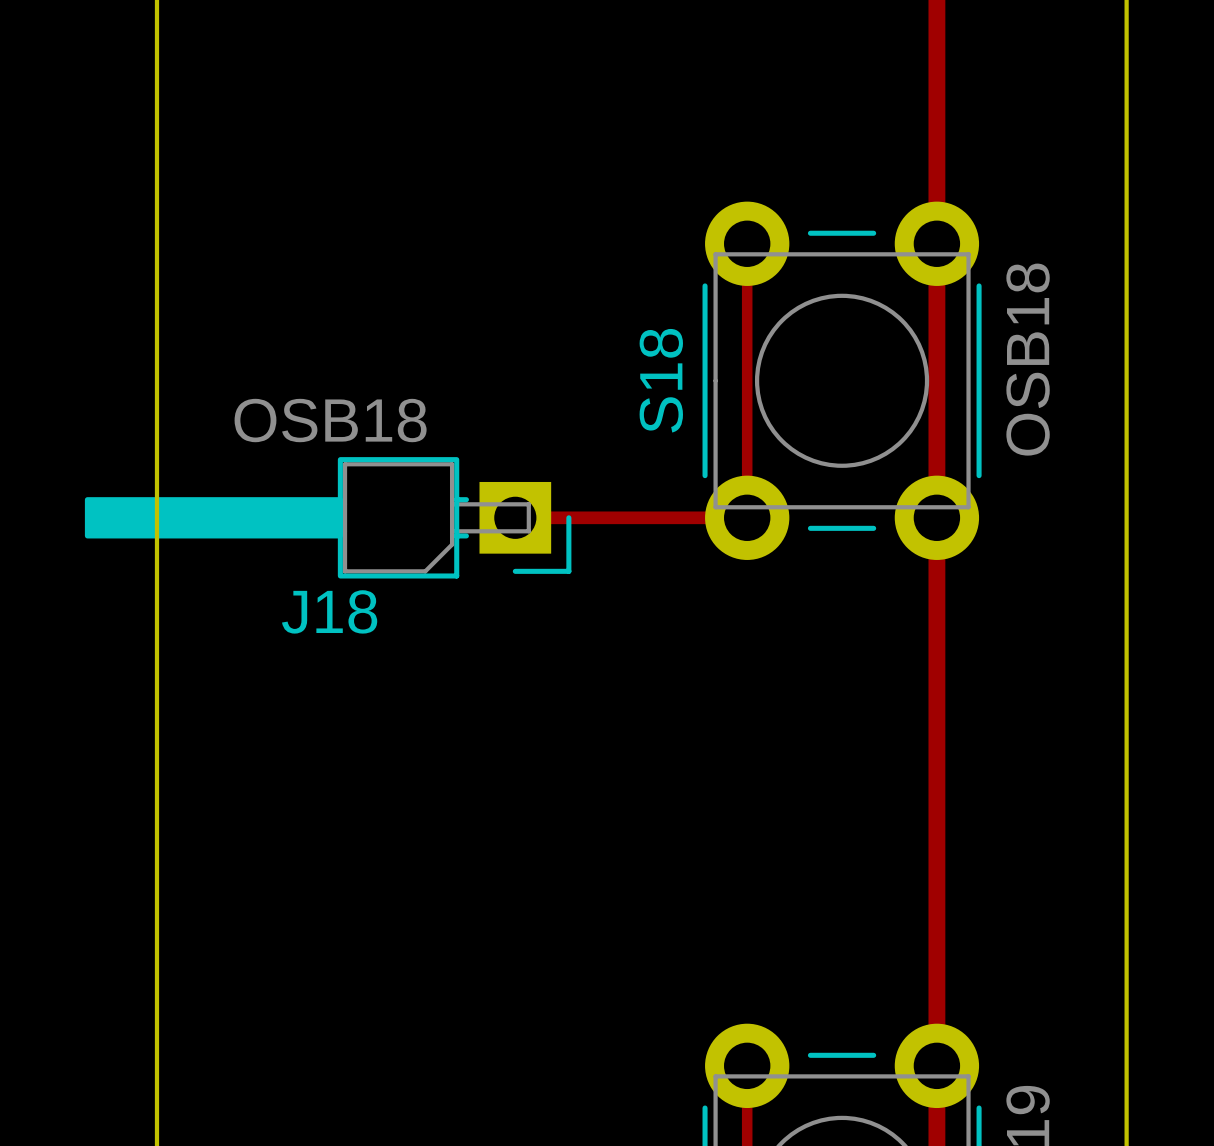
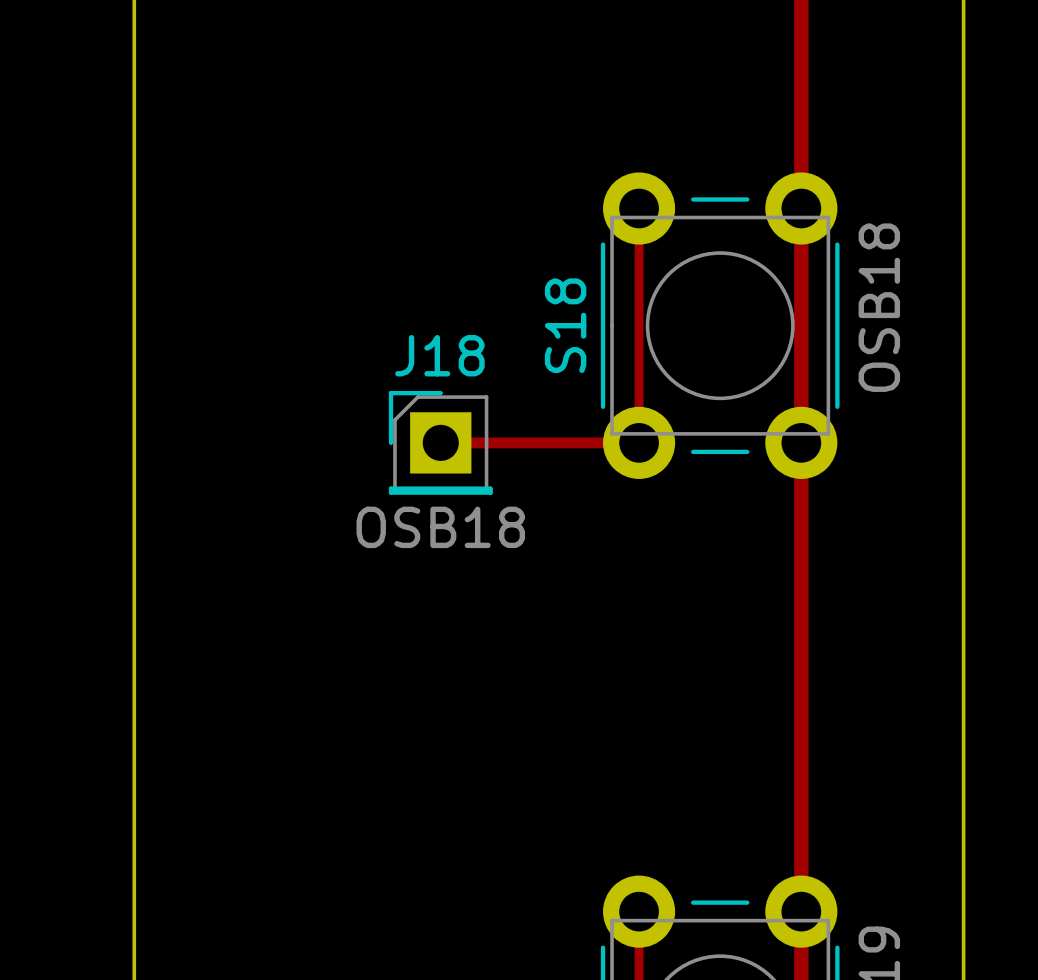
J18 value position: OSB18 (330, 420) -> OSB18 (440, 527)
J18 footprint: [84, 457, 572, 579] -> [388, 390, 493, 495]
J18 name position: J18 (329, 611) -> J18 (439, 355)

